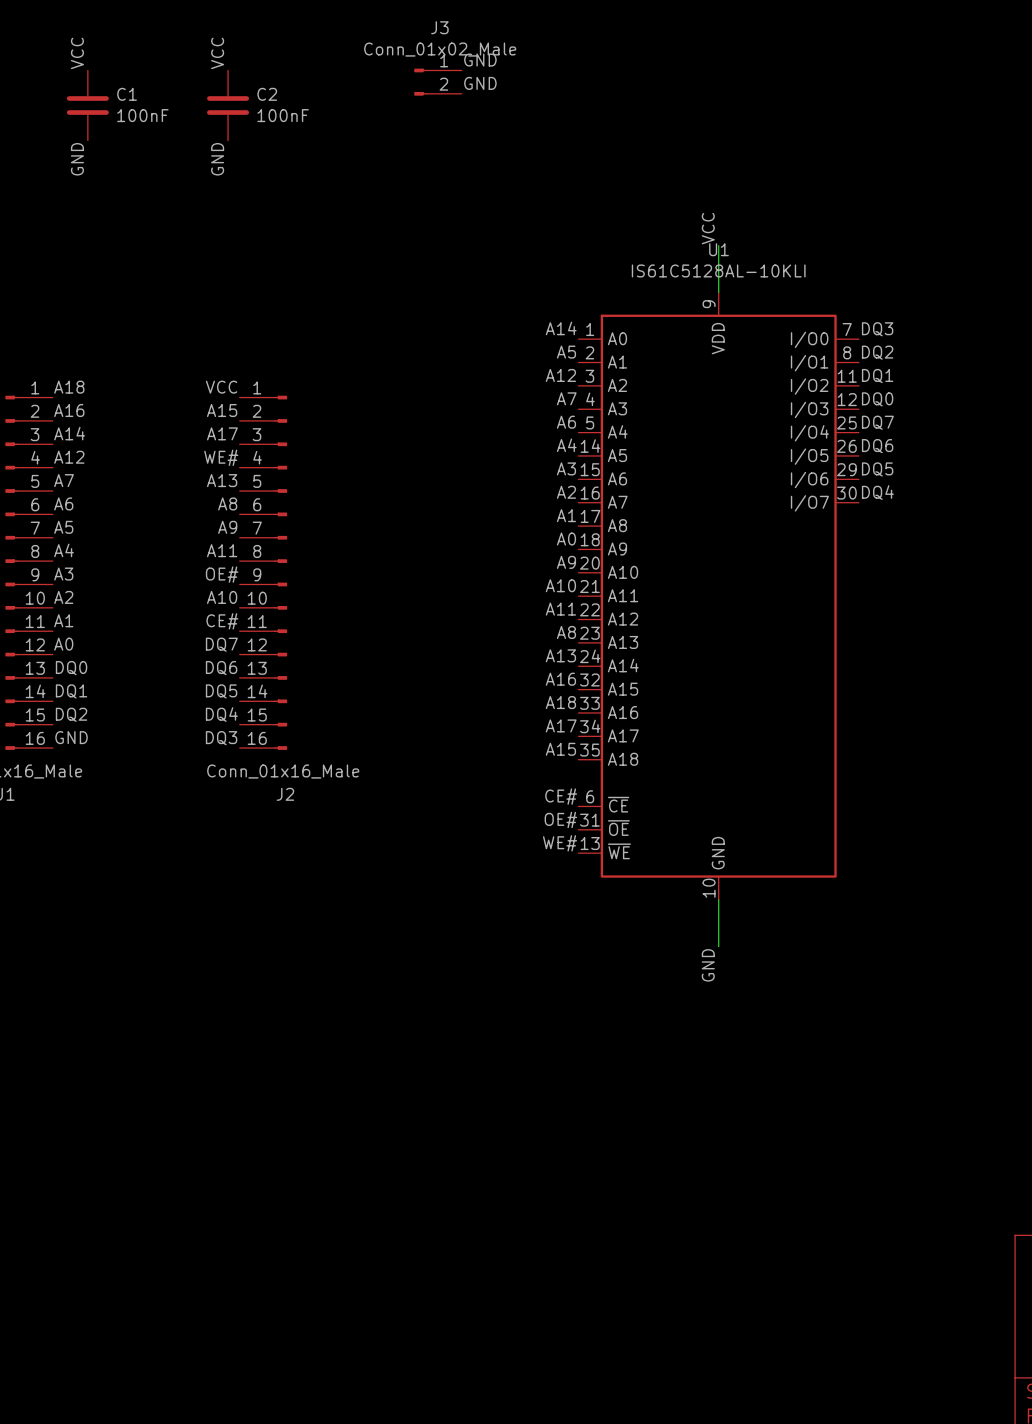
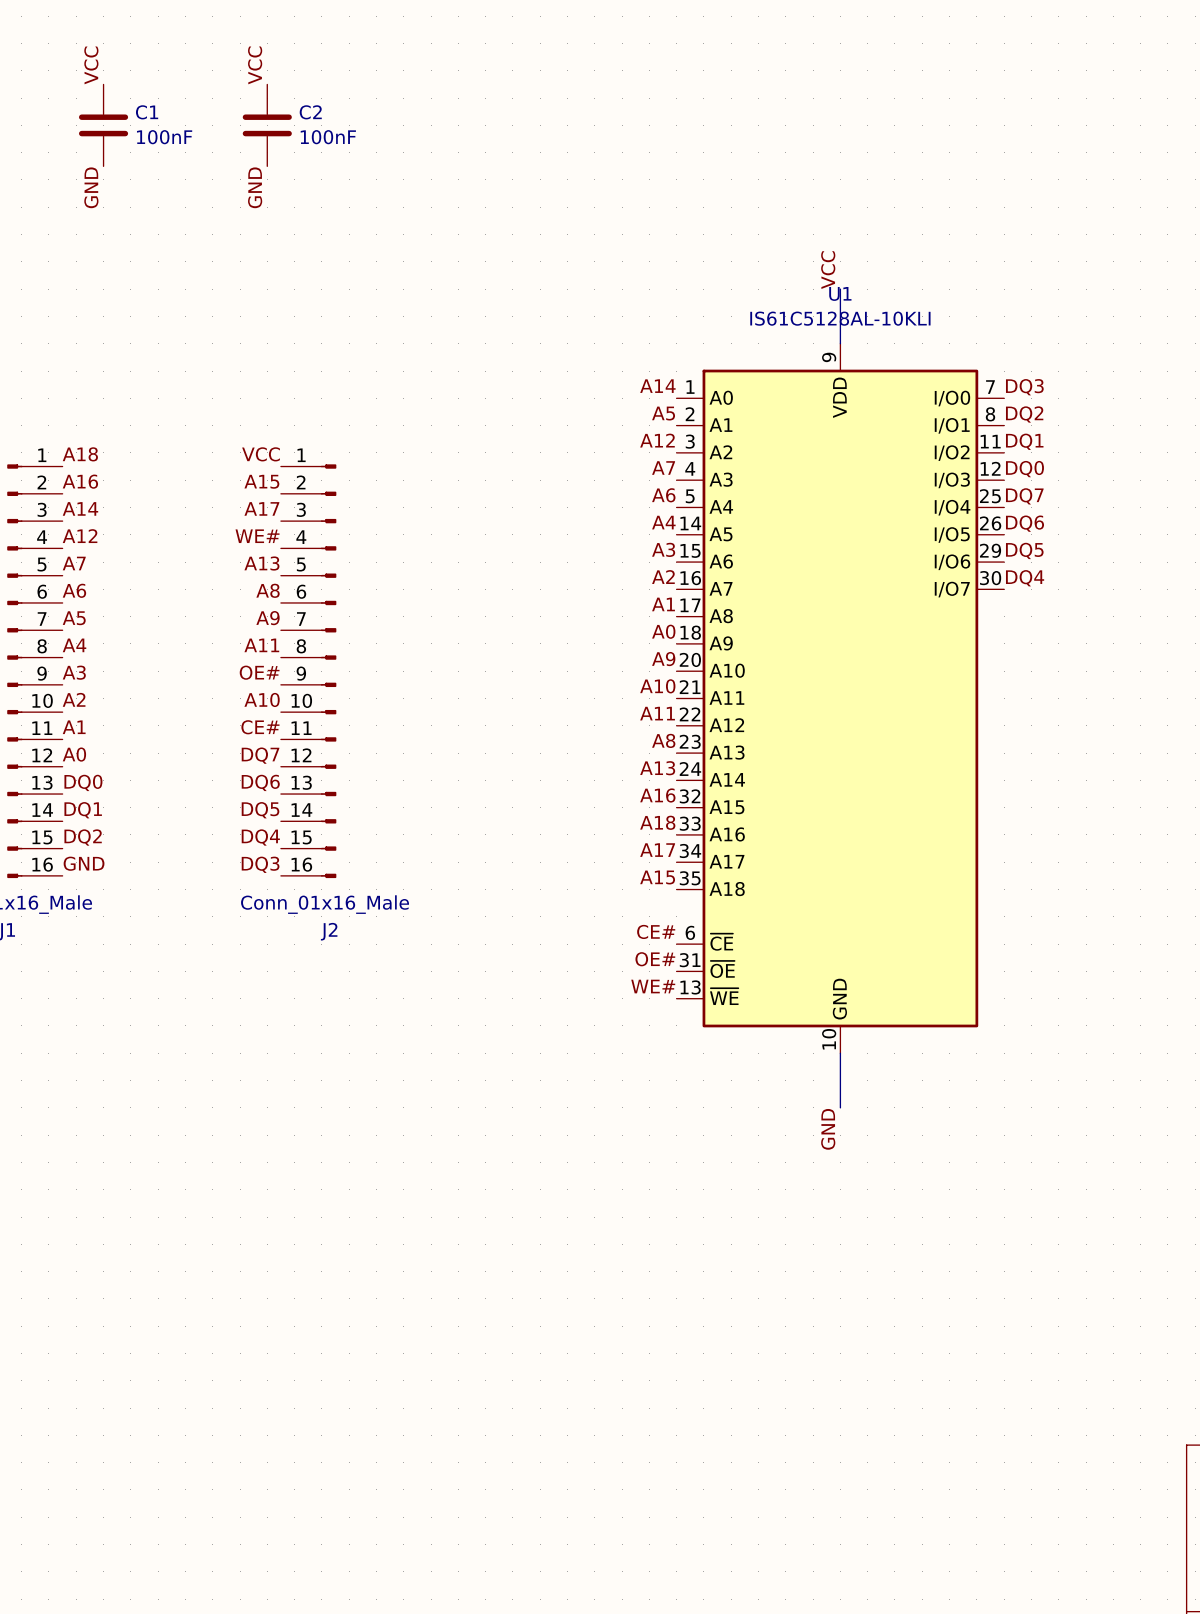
label: GND (480, 60) -> none
J3: Conn_01x02_Male (437, 82) -> none
label: GND (480, 83) -> none

